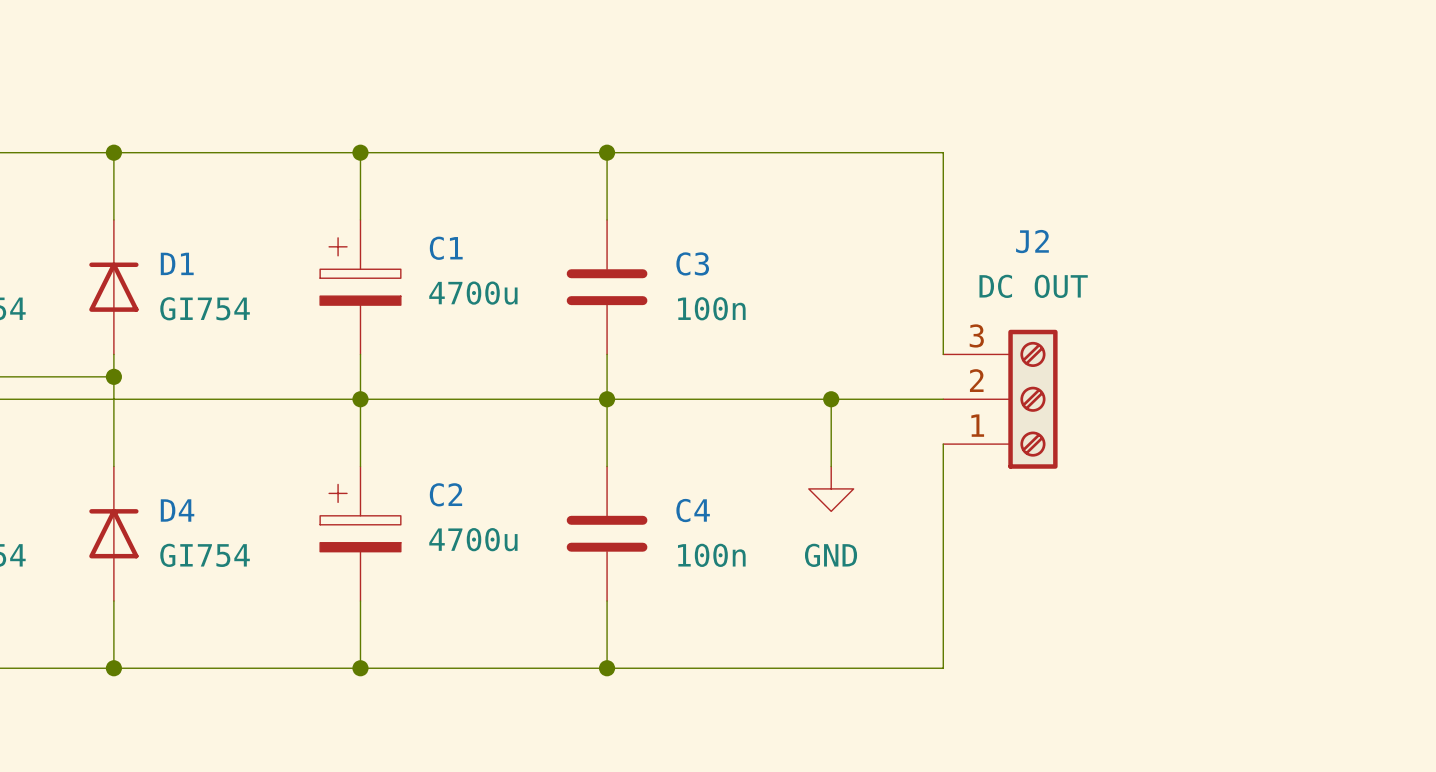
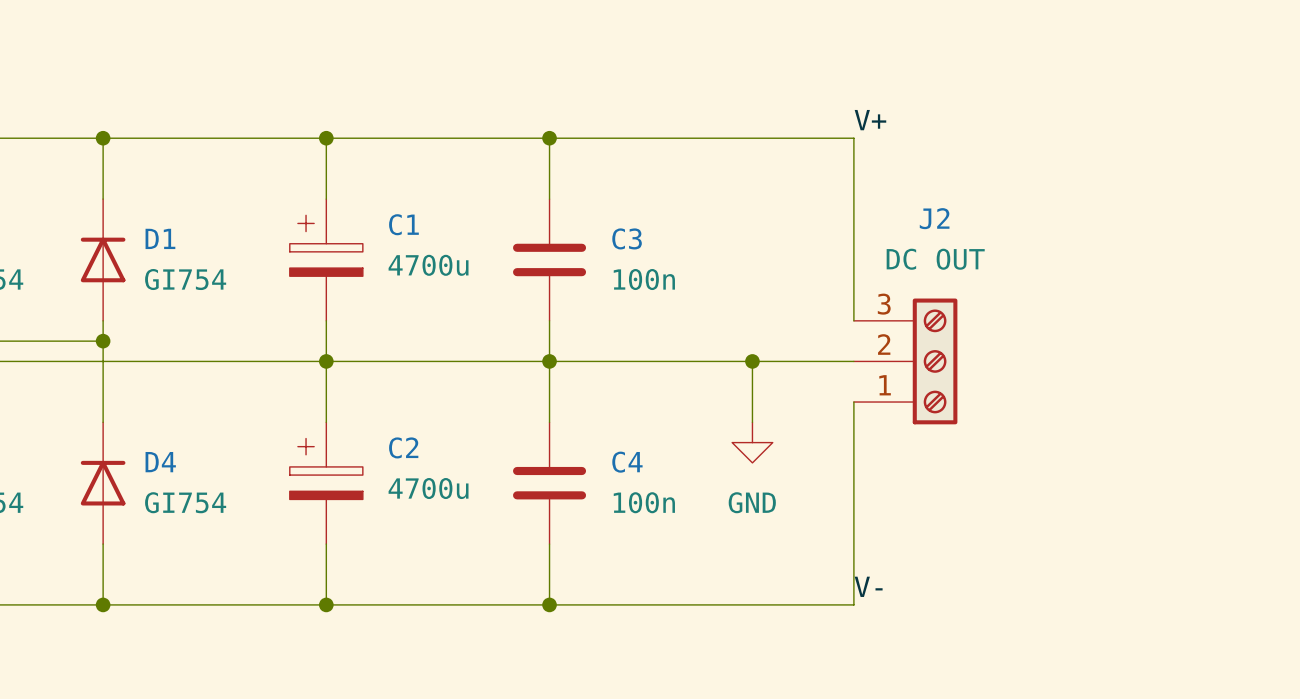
label: none -> V+ (870, 120)
label: none -> V- (868, 586)

